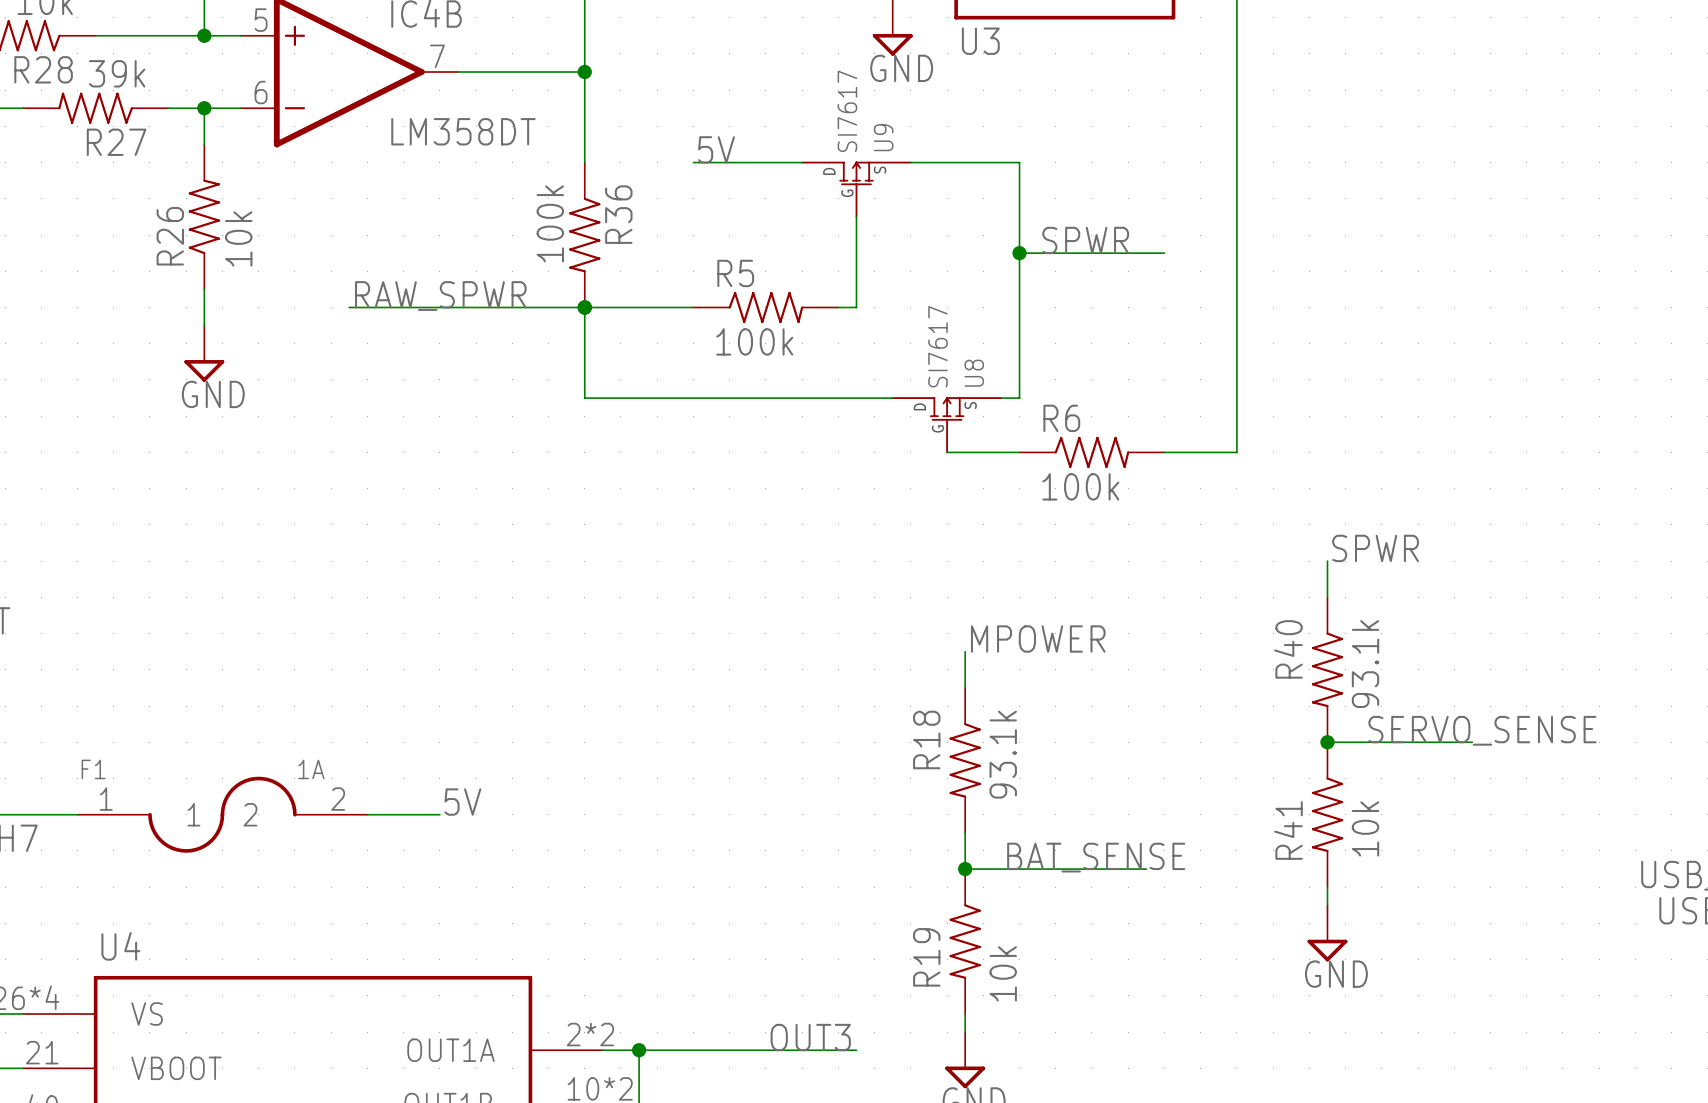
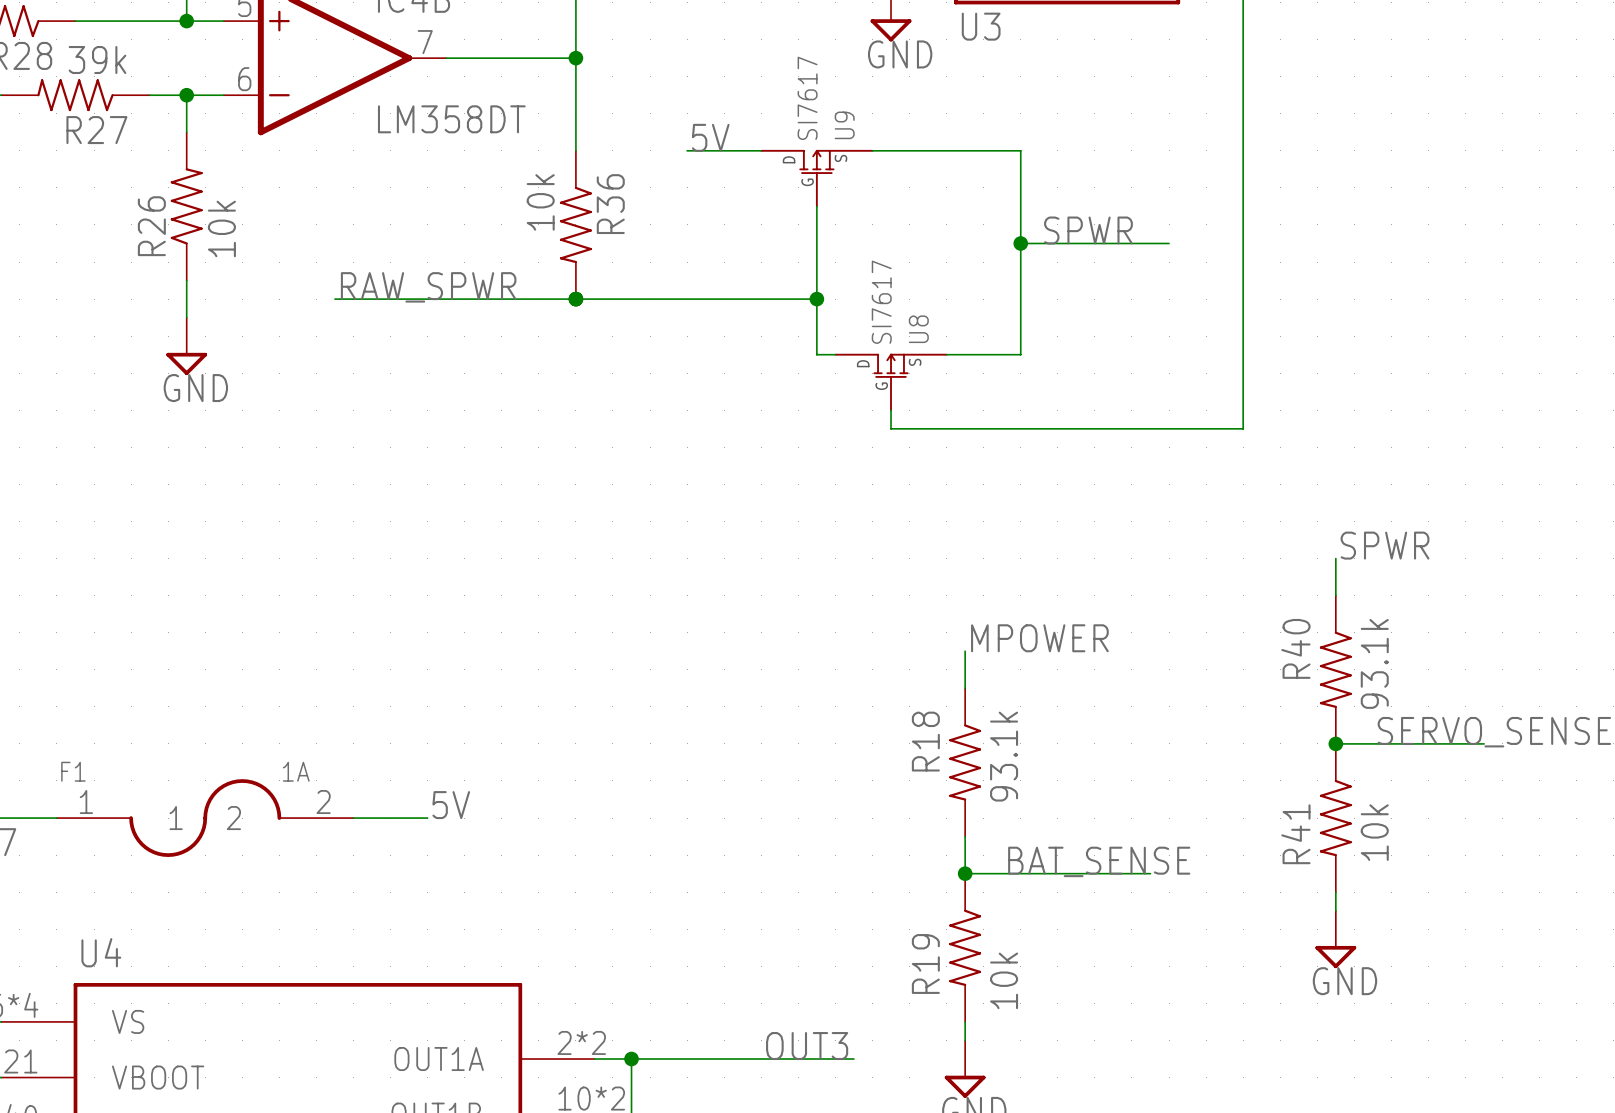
U9 position: (856, 189) -> (816, 178)
wire: none -> (816, 206) (816, 354) (835, 354)
wire: (856, 216) (856, 307) (838, 307) -> none
R36 value: 100k (550, 223) -> 10k (540, 202)
wire: (584, 307) (584, 398) (892, 398) -> none
R5: 100k (765, 307) -> none
junction: none -> (816, 299)
wire: (1019, 361) (1019, 398) (1001, 398) -> (1020, 354) (946, 354)
U8 position: (947, 425) -> (891, 382)
wire: (1236, 434) (1236, 452) (1164, 452) -> (1243, 428) (891, 428) (891, 410)
wire: (947, 452) (1019, 452) -> none
R6: 100k (1091, 452) -> none

